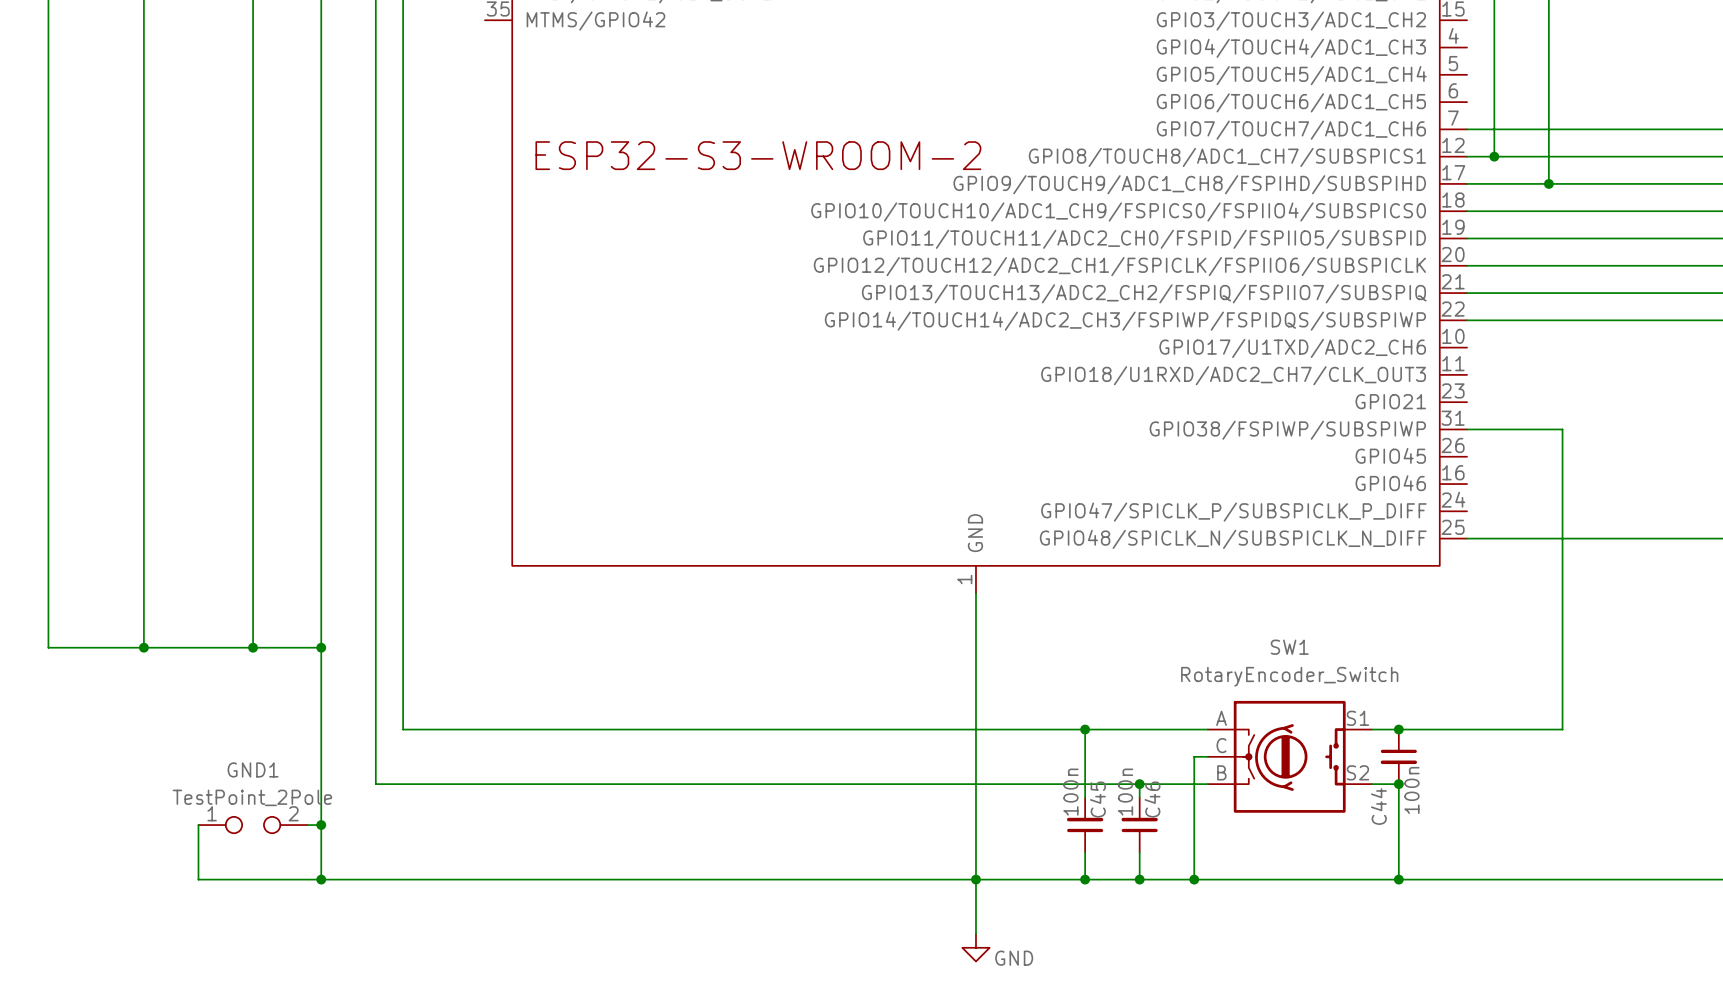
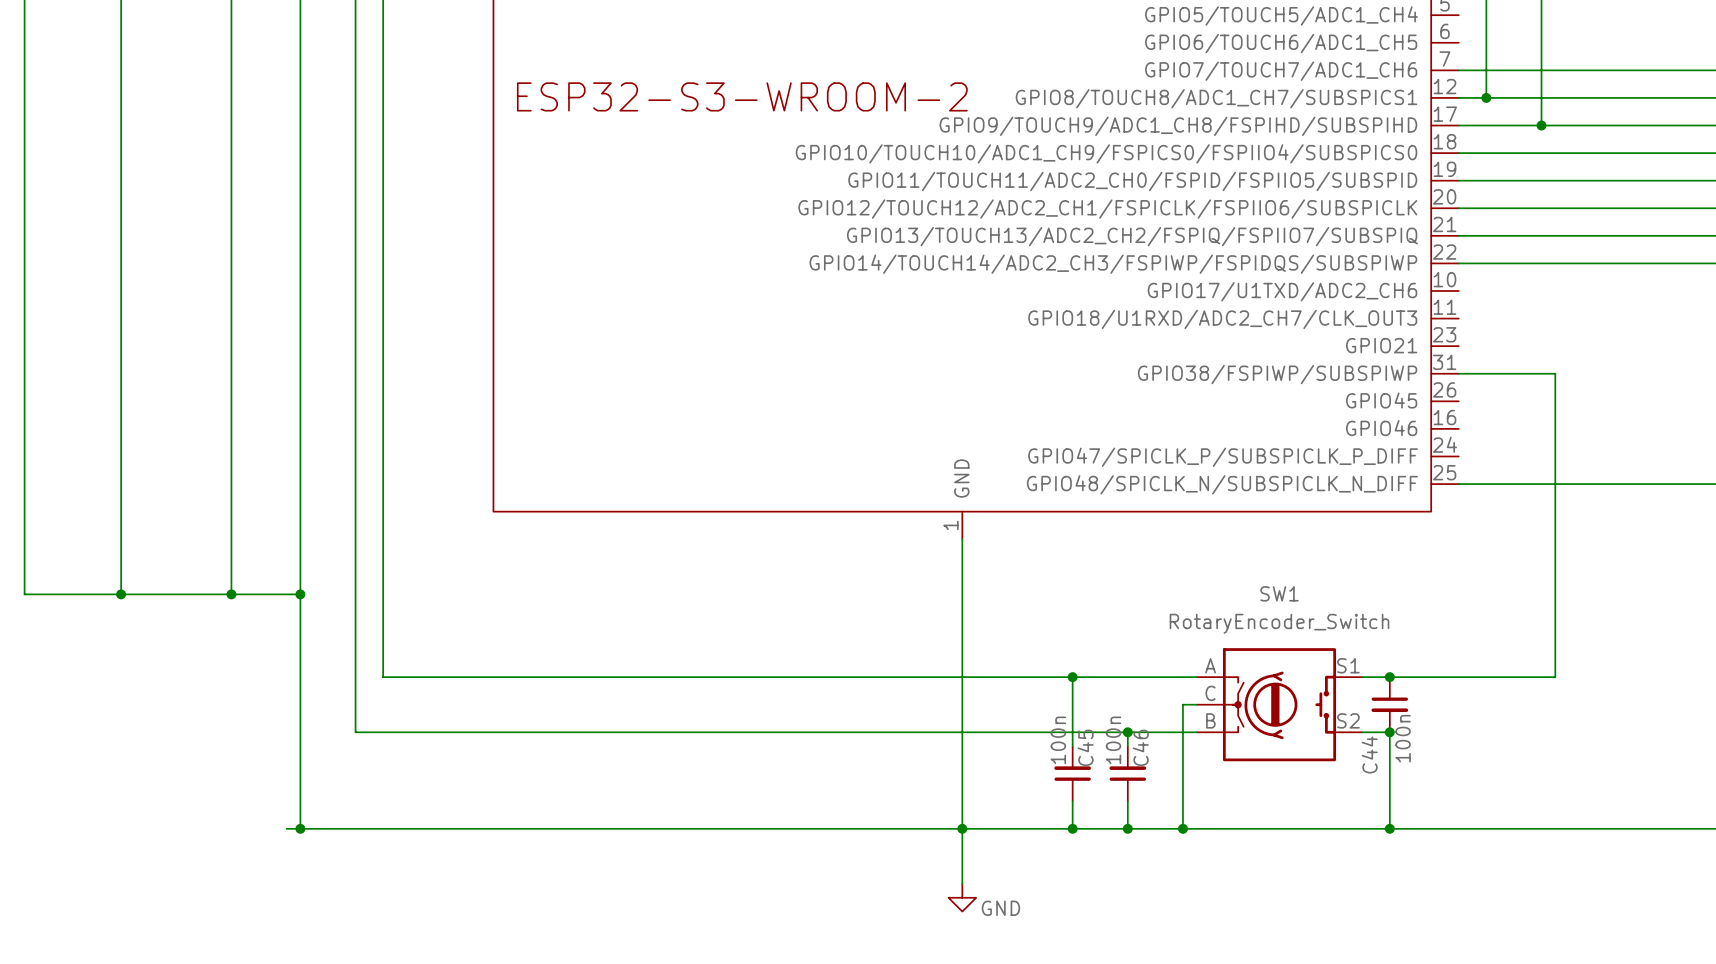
wire: (198, 825) (198, 879) (307, 879) -> none
GND1: TestPoint_2Pole (253, 825) -> none
wire: (307, 825) (321, 825) -> none
junction: (321, 825) -> none

